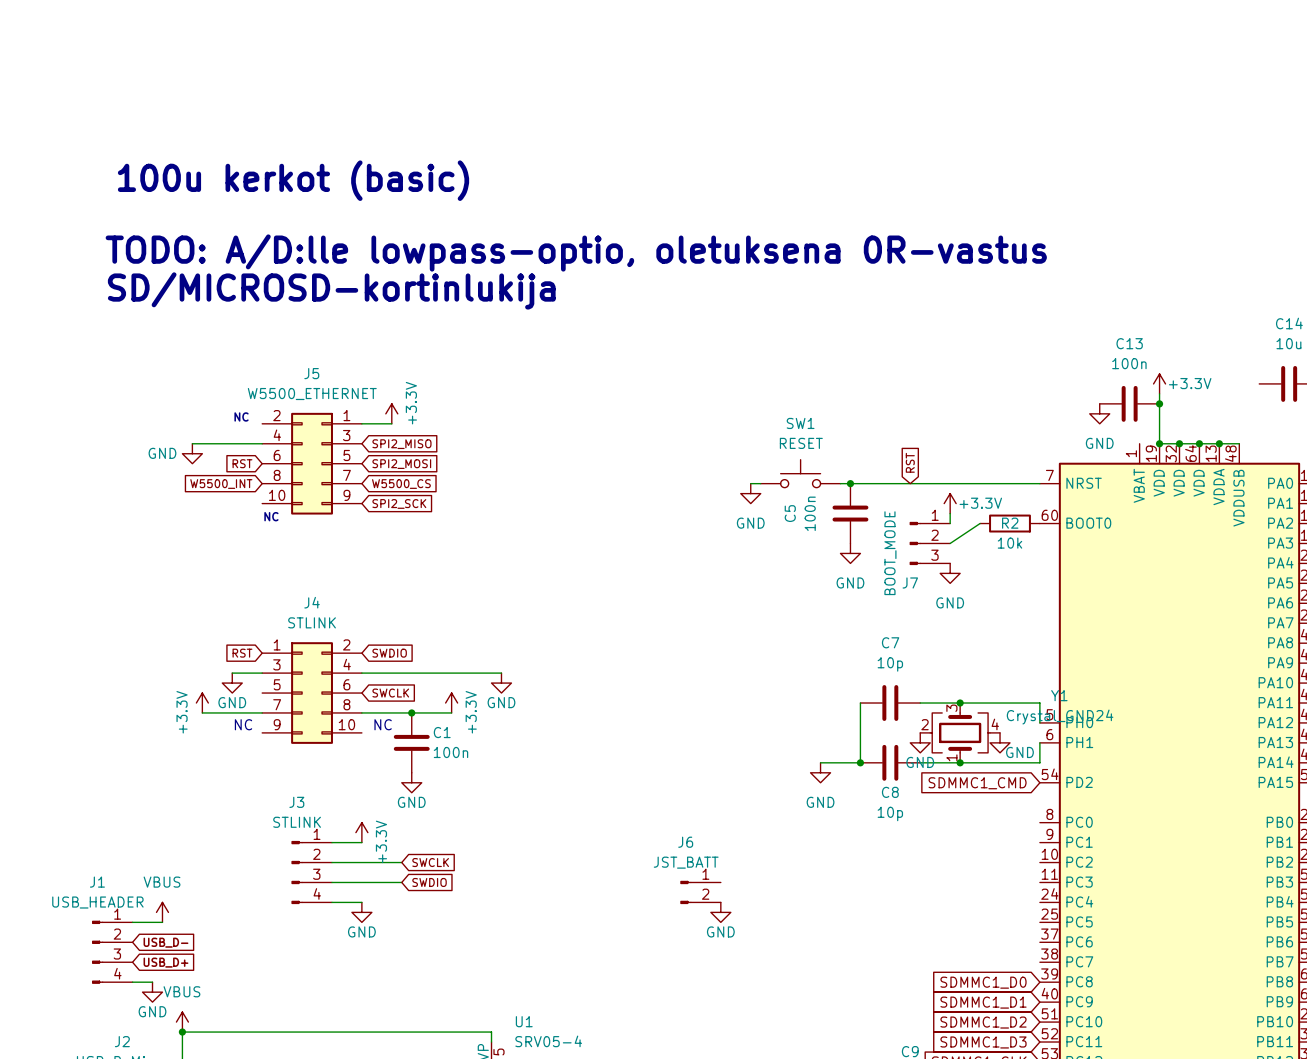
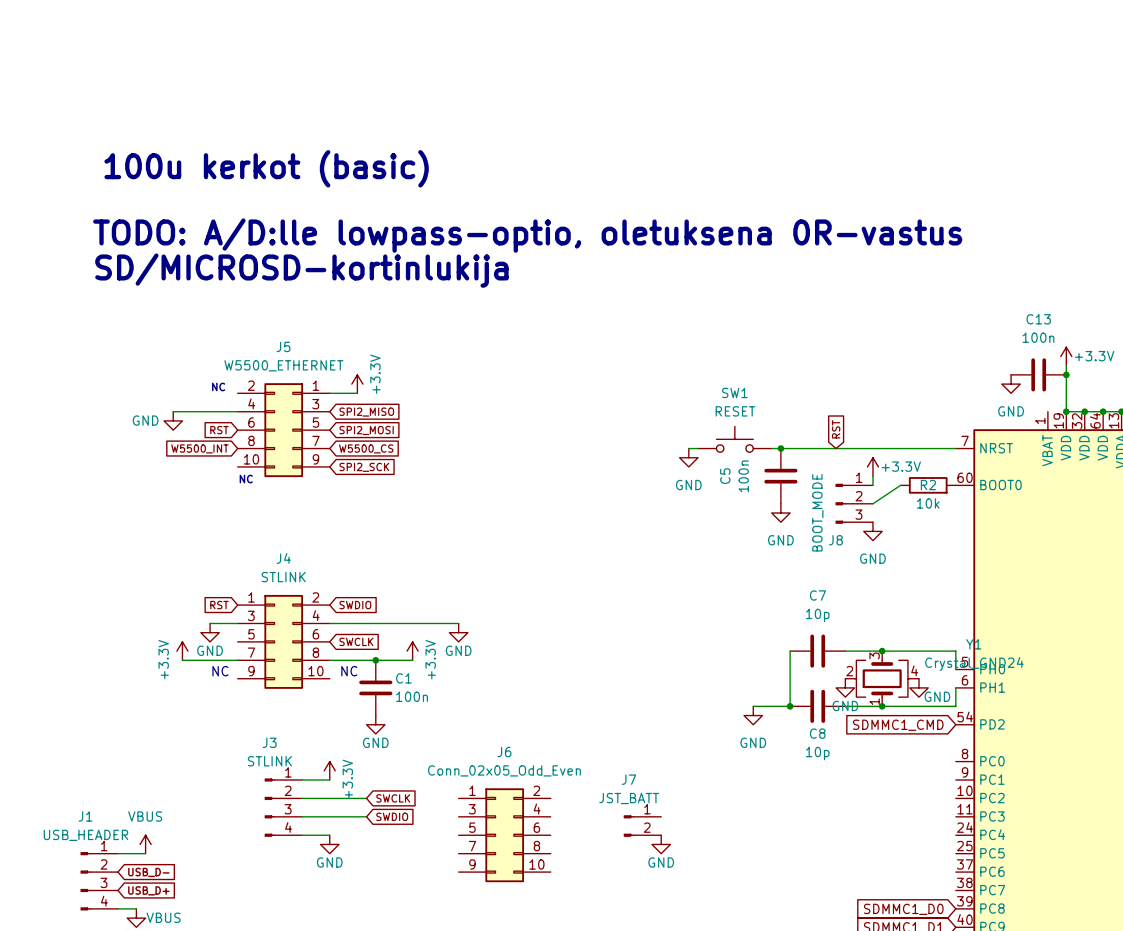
J7 name: J7 (910, 582) -> J8 (835, 540)
J6 name: J6 (685, 842) -> J7 (628, 779)
J6: none -> Conn_02x05_Odd_Even (504, 835)

